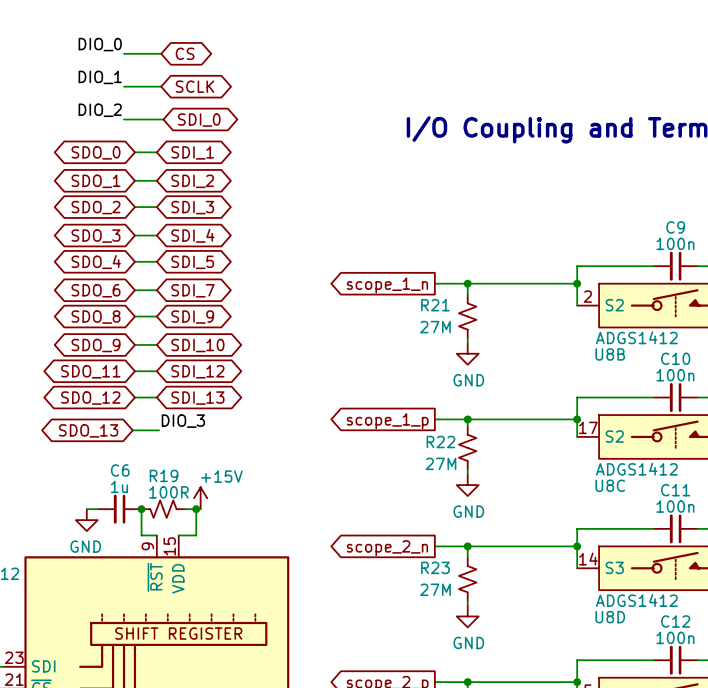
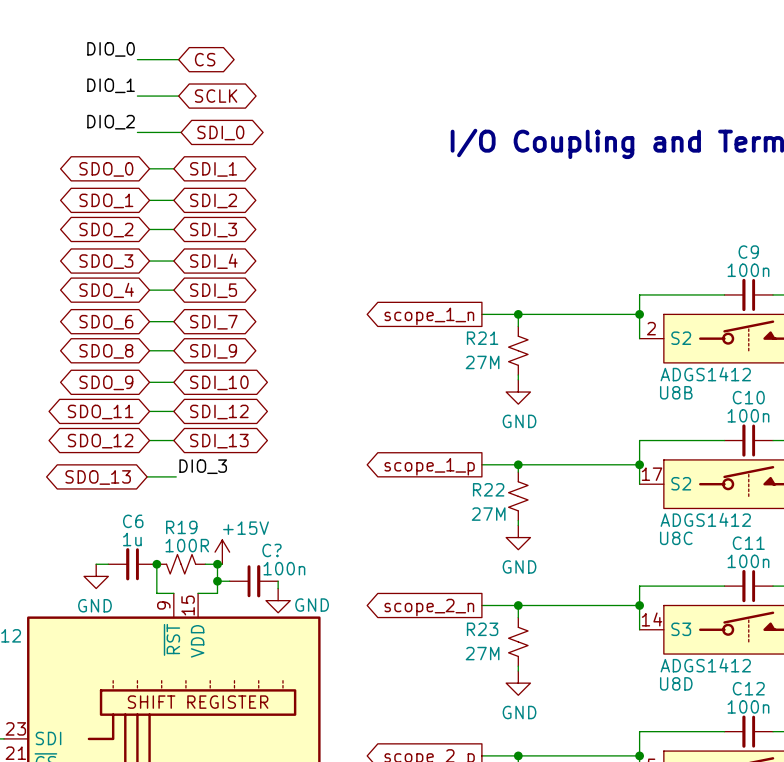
wire: none -> (217, 581) (229, 581)
junction: none -> (217, 581)
C?: none -> 100n (253, 581)
wire: none -> (278, 581) (278, 588)
power symbol: none -> GND (278, 600)

